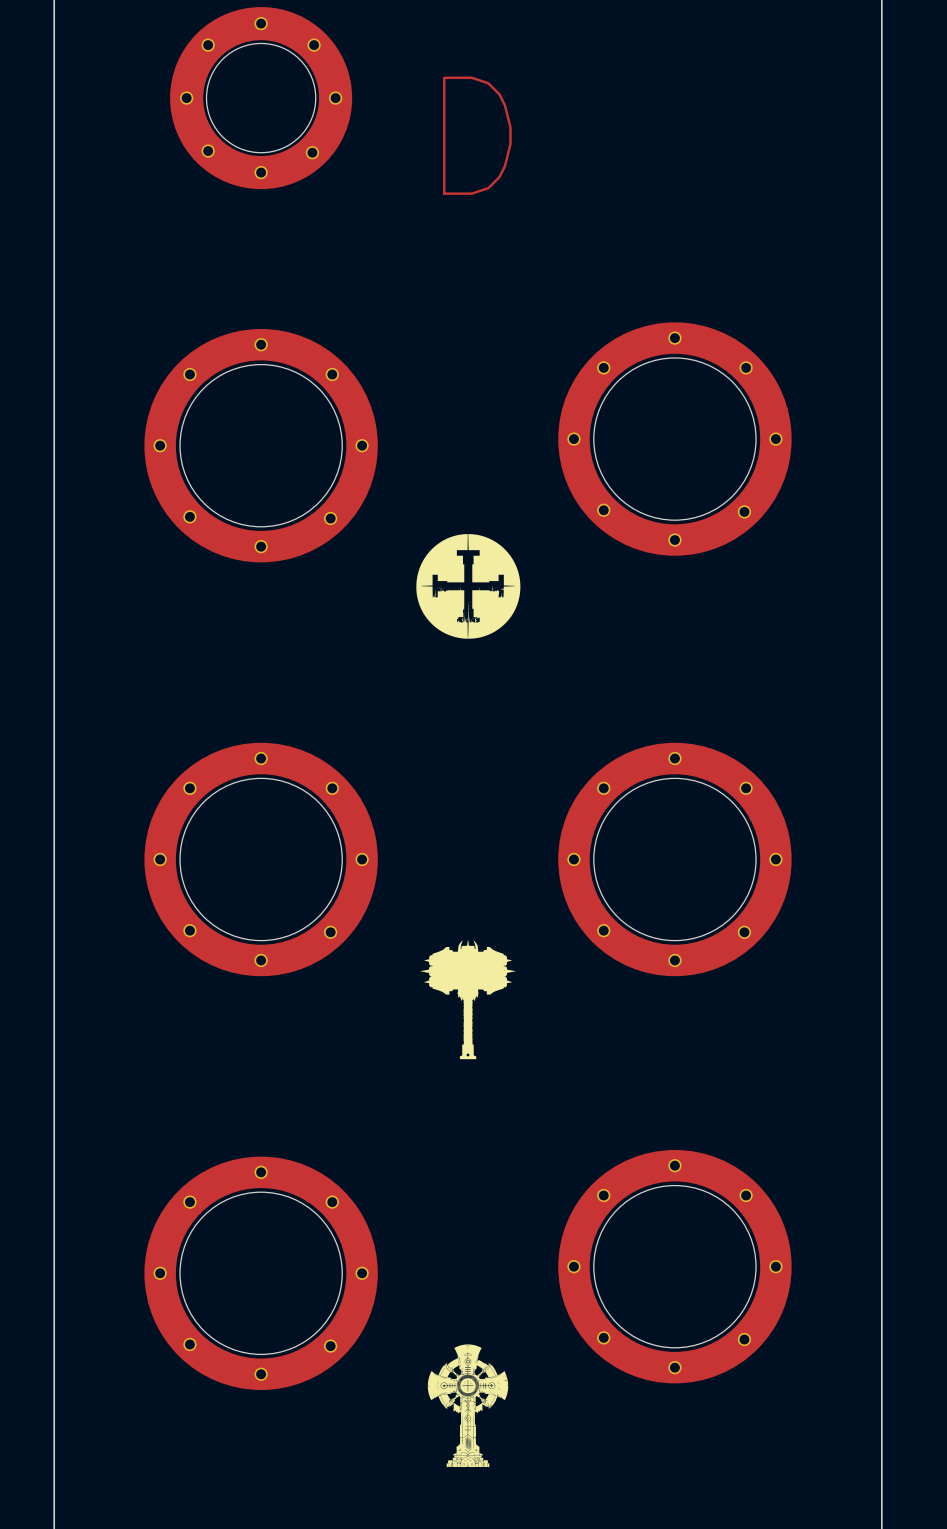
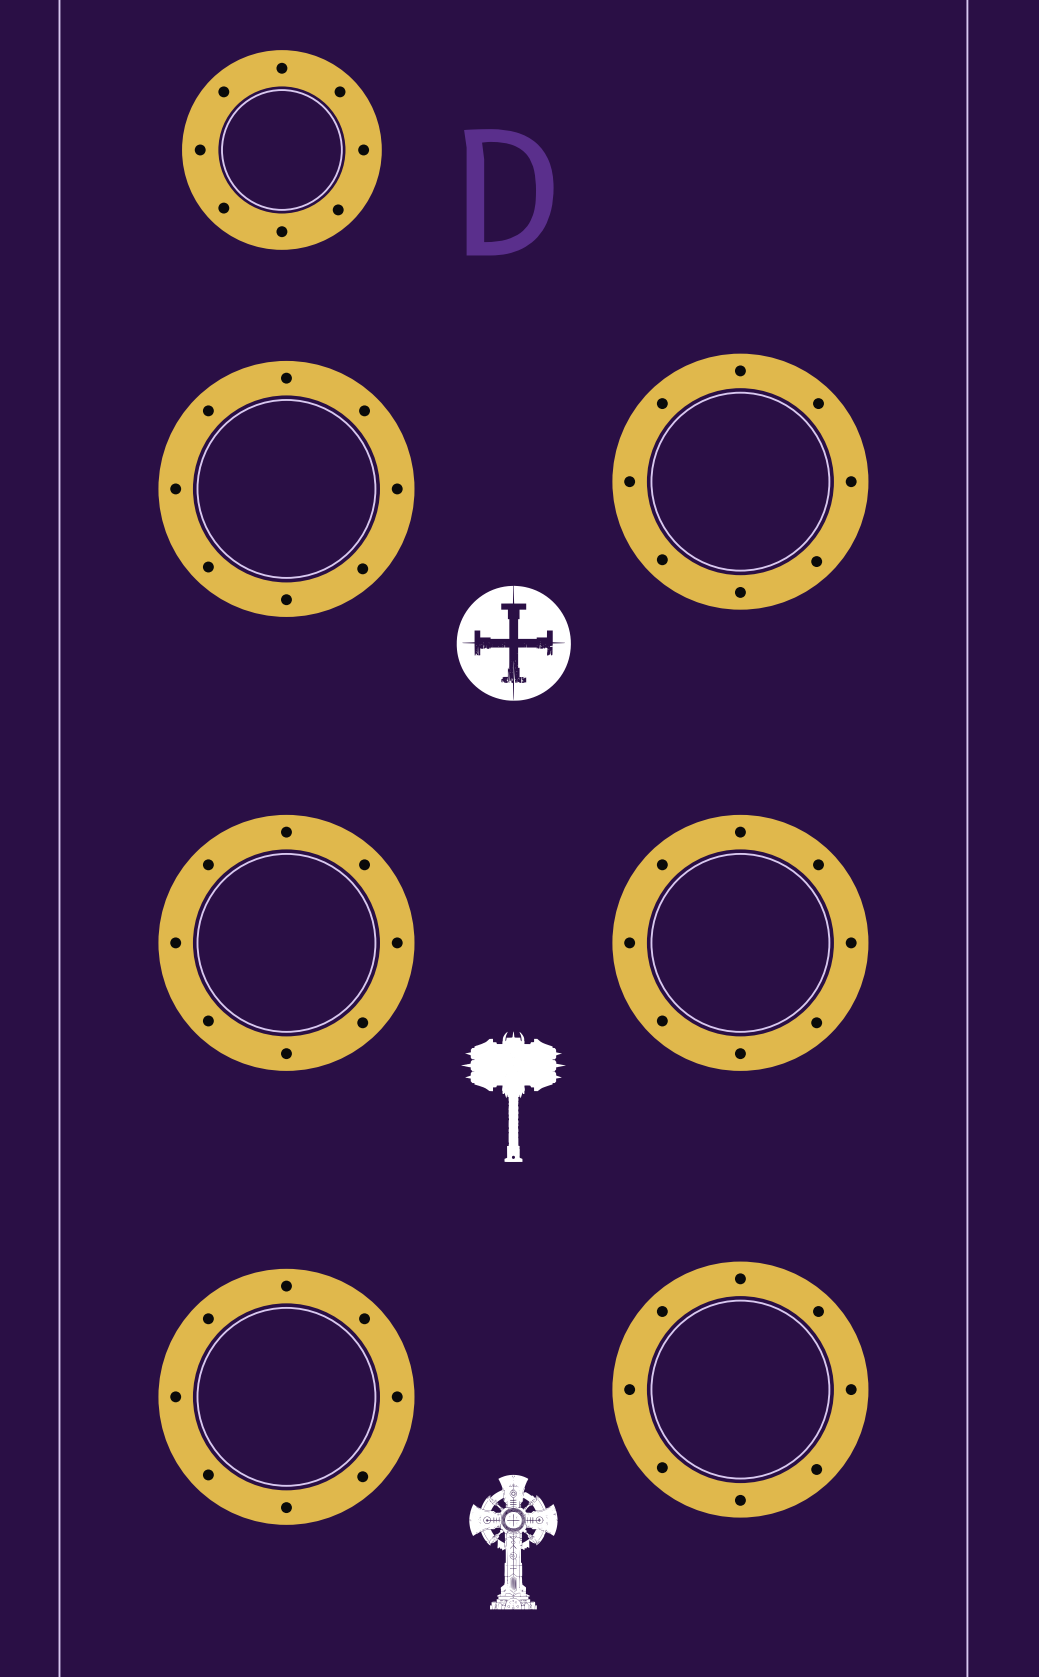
part position: (261, 98) -> (281, 149)
text position: D (477, 135) -> D (508, 192)

